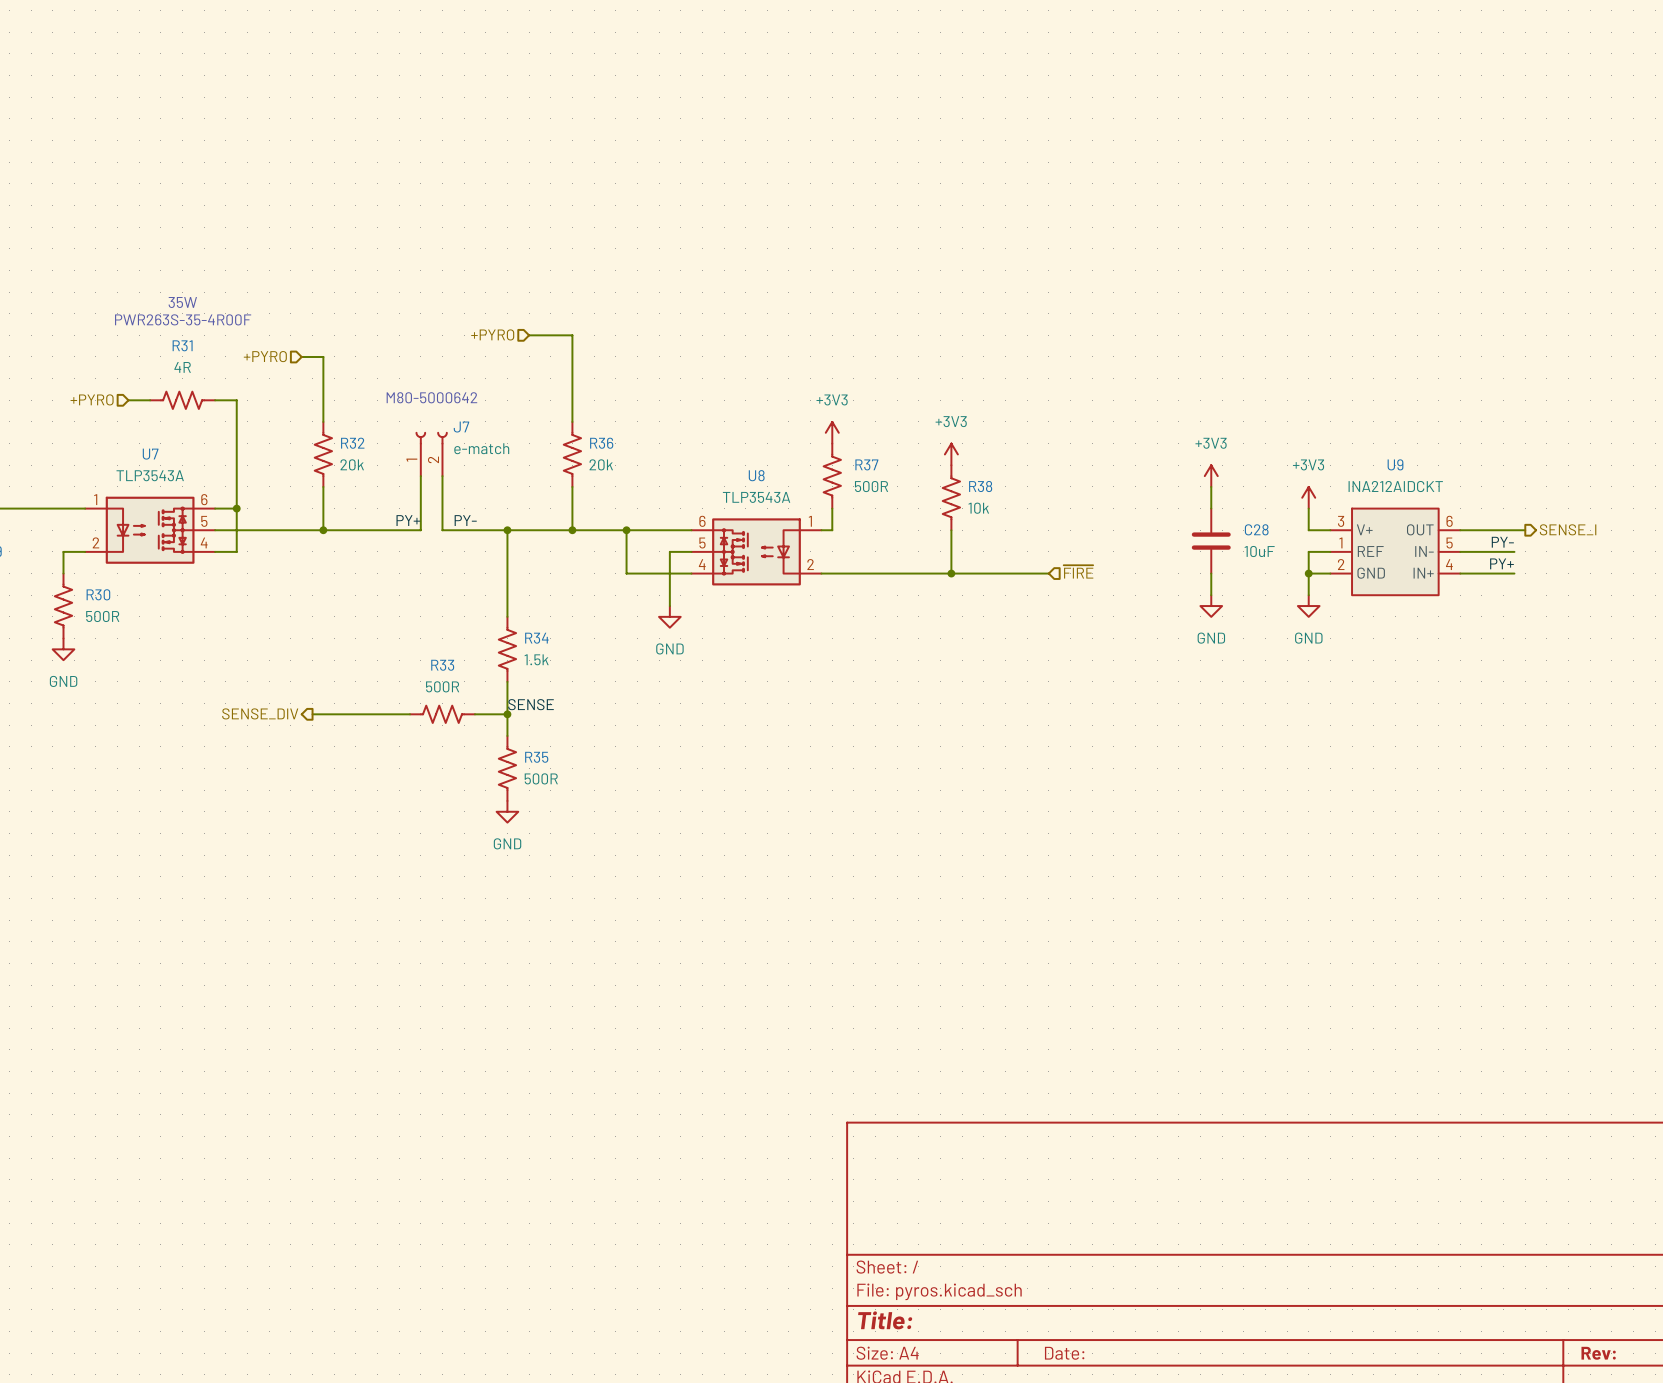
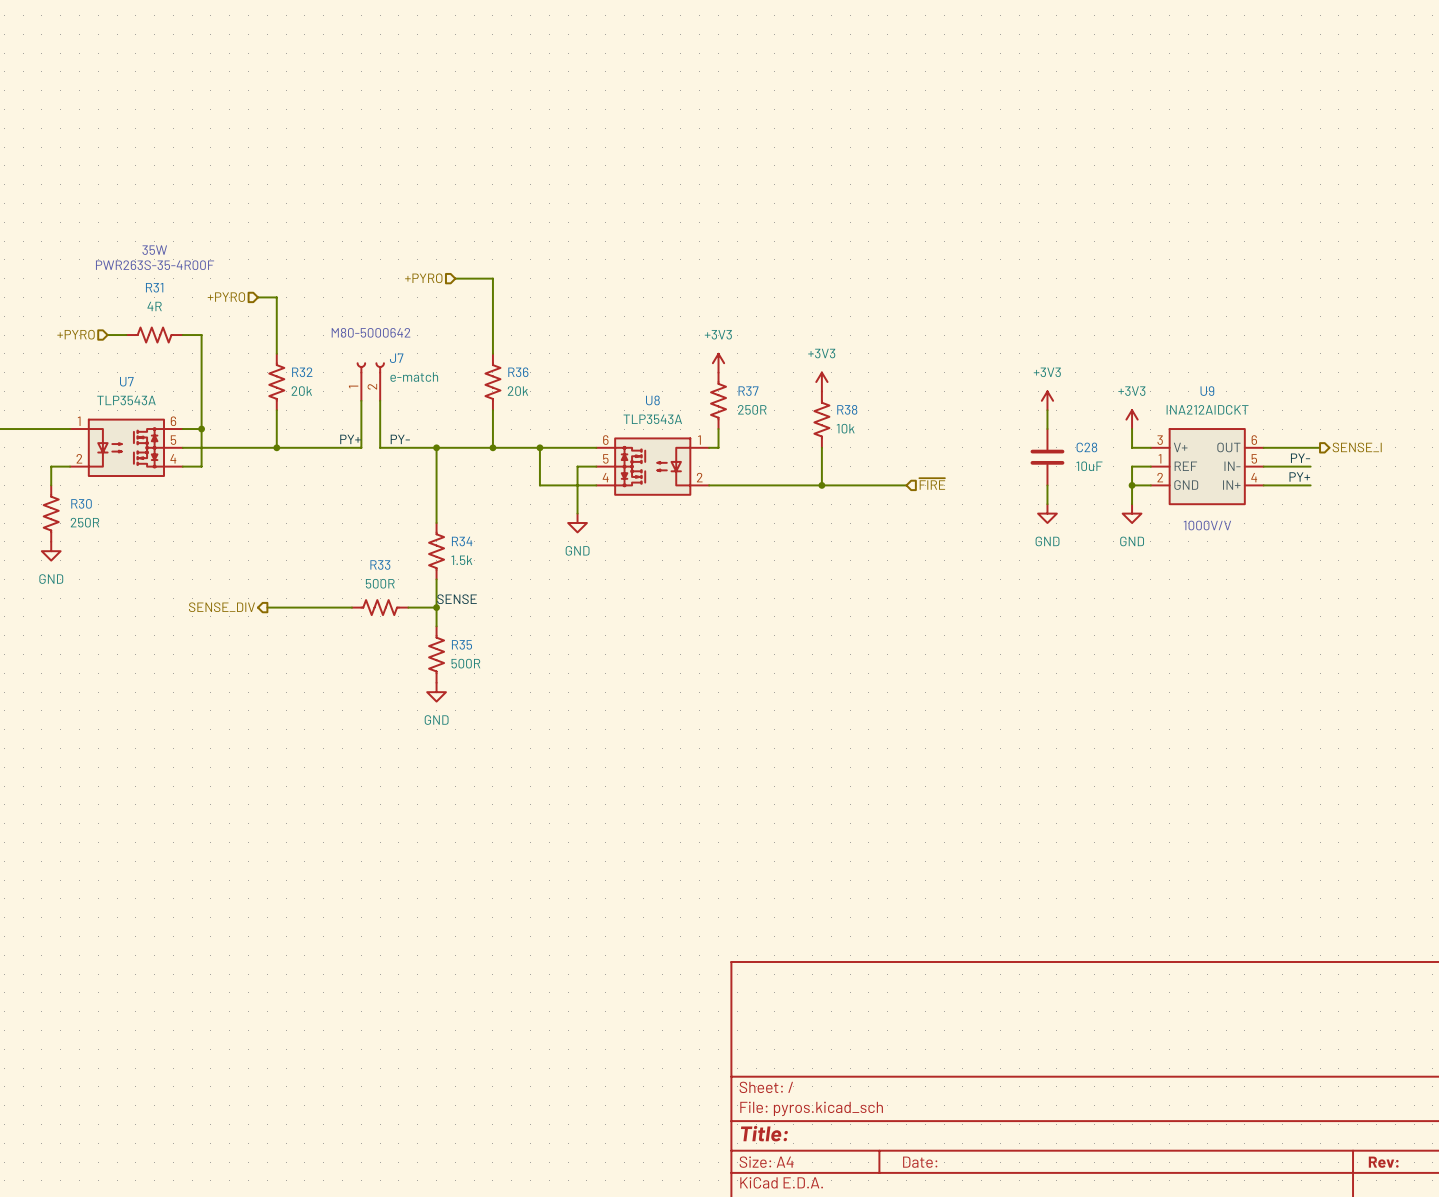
R37 value: 500R (871, 486) -> 250R (752, 409)
R30 value: 500R (102, 616) -> 250R (85, 522)
text: none -> 1000V/V (1207, 525)

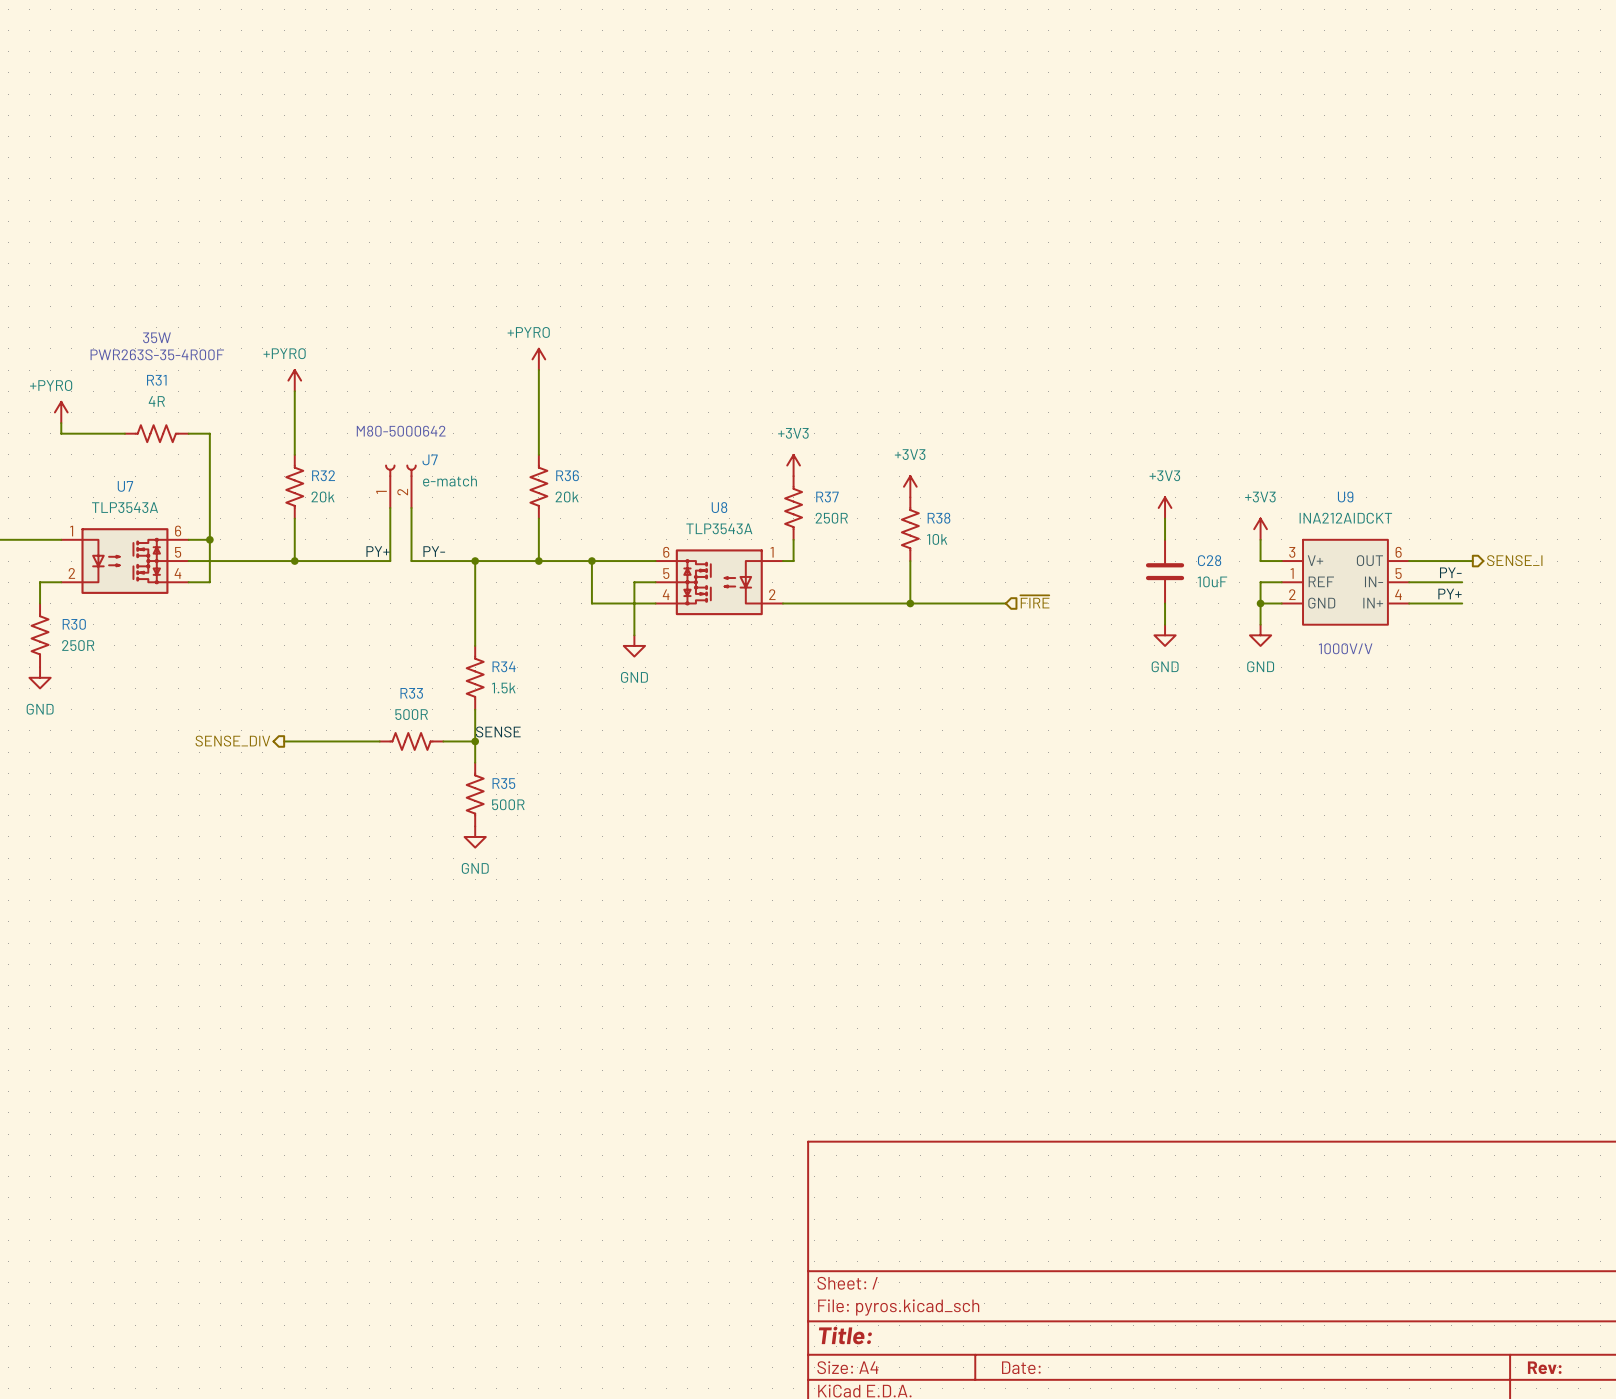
power symbol: none -> +PYRO (538, 359)
hierarchical label: +PYRO (423, 278) -> none
wire: (455, 278) (492, 278) -> none
power symbol: none -> +PYRO (294, 380)
hierarchical label: +PYRO (226, 297) -> none
wire: (257, 297) (276, 297) -> none
power symbol: none -> +PYRO (61, 412)
wire: none -> (61, 423) (61, 433) (103, 433)
hierarchical label: +PYRO (76, 334) -> none

